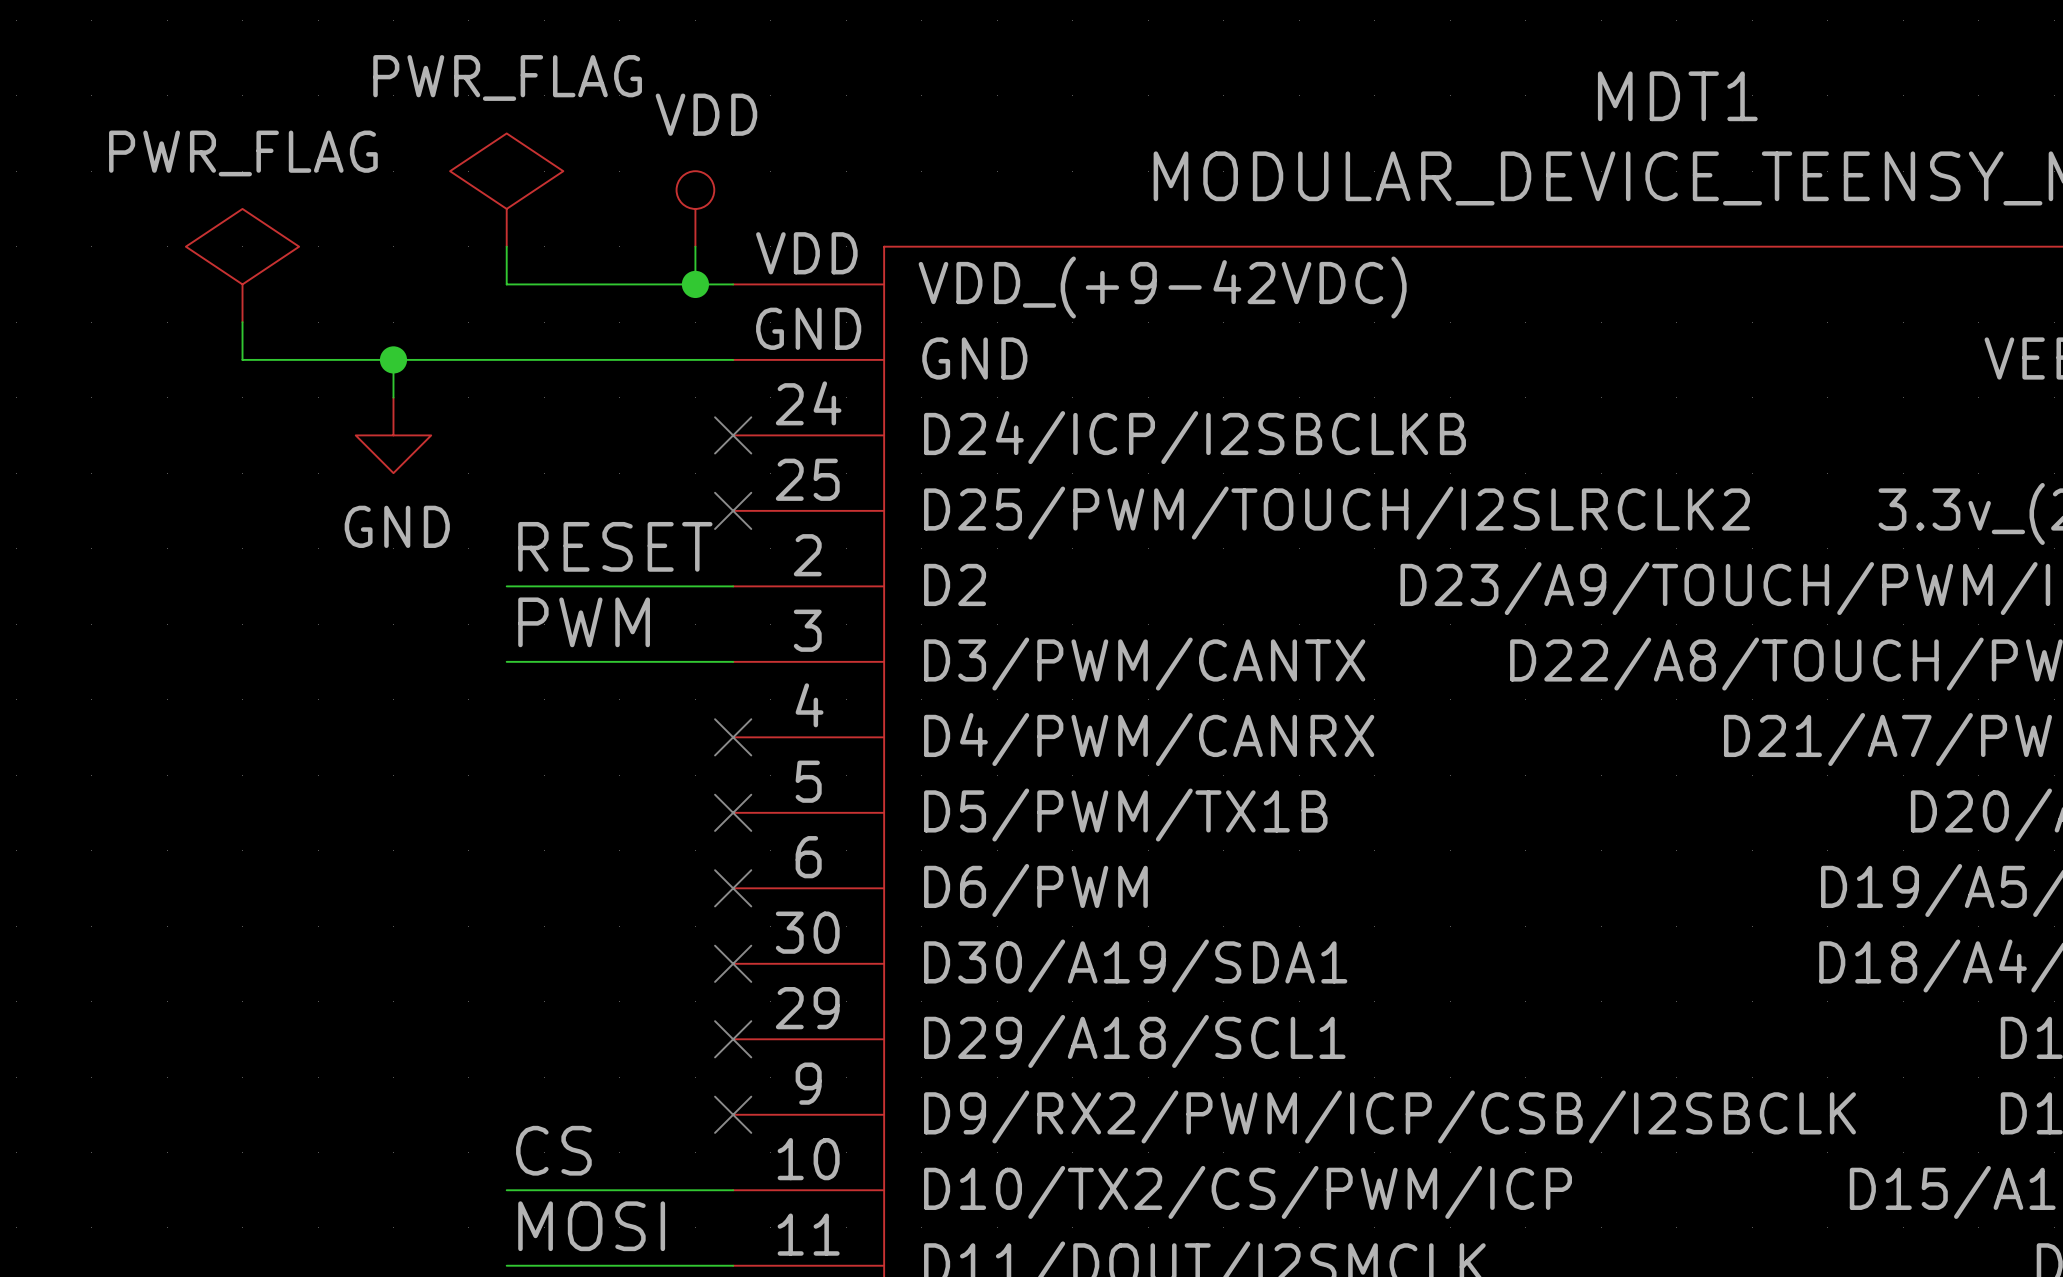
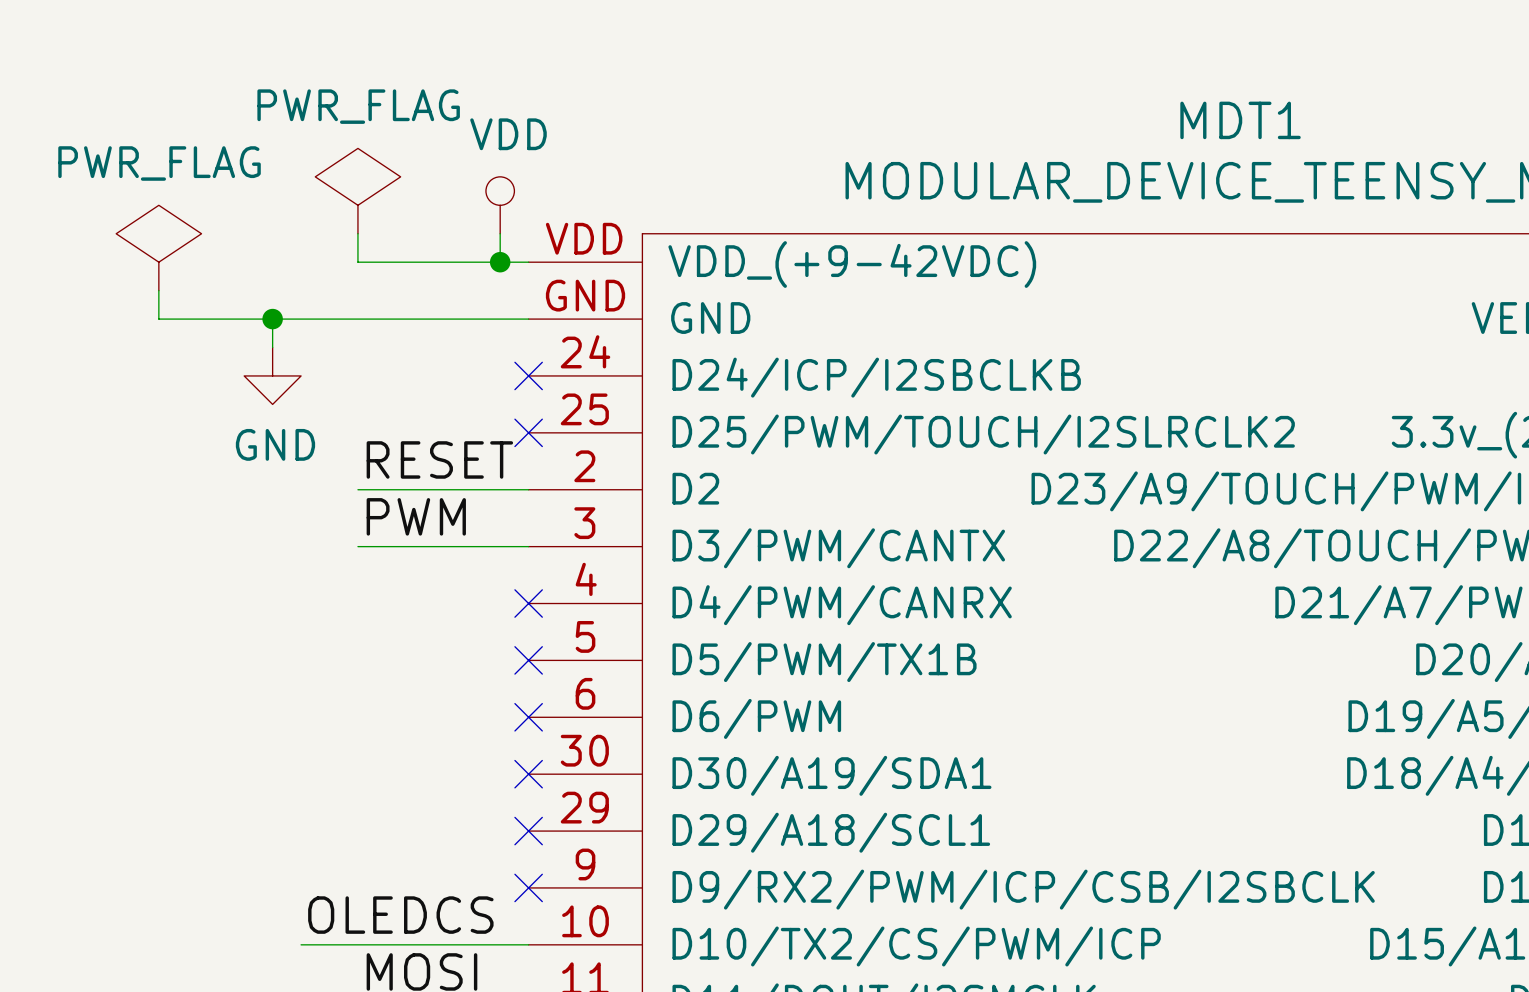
label: CS (553, 1150) -> none
label: none -> OLEDCS (400, 915)
wire: none -> (301, 944) (357, 944)

